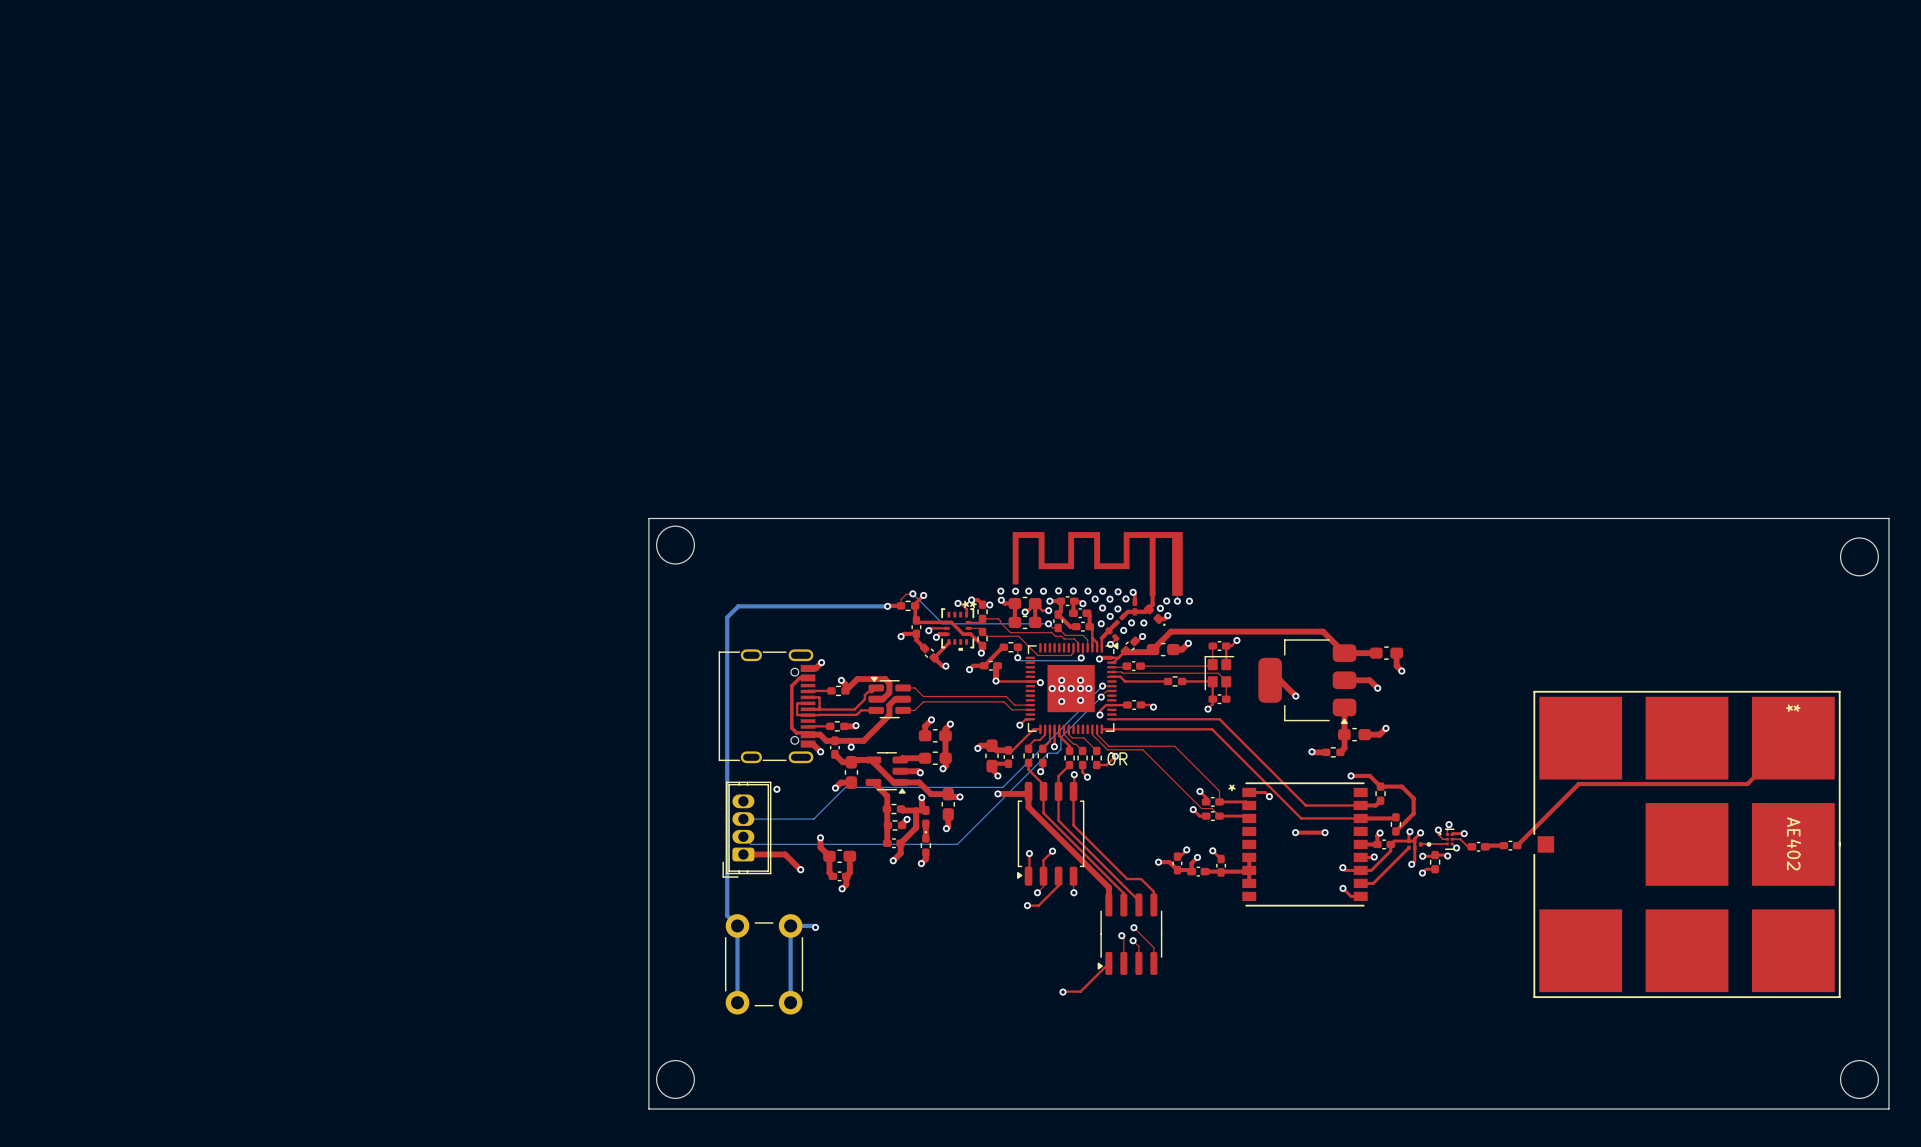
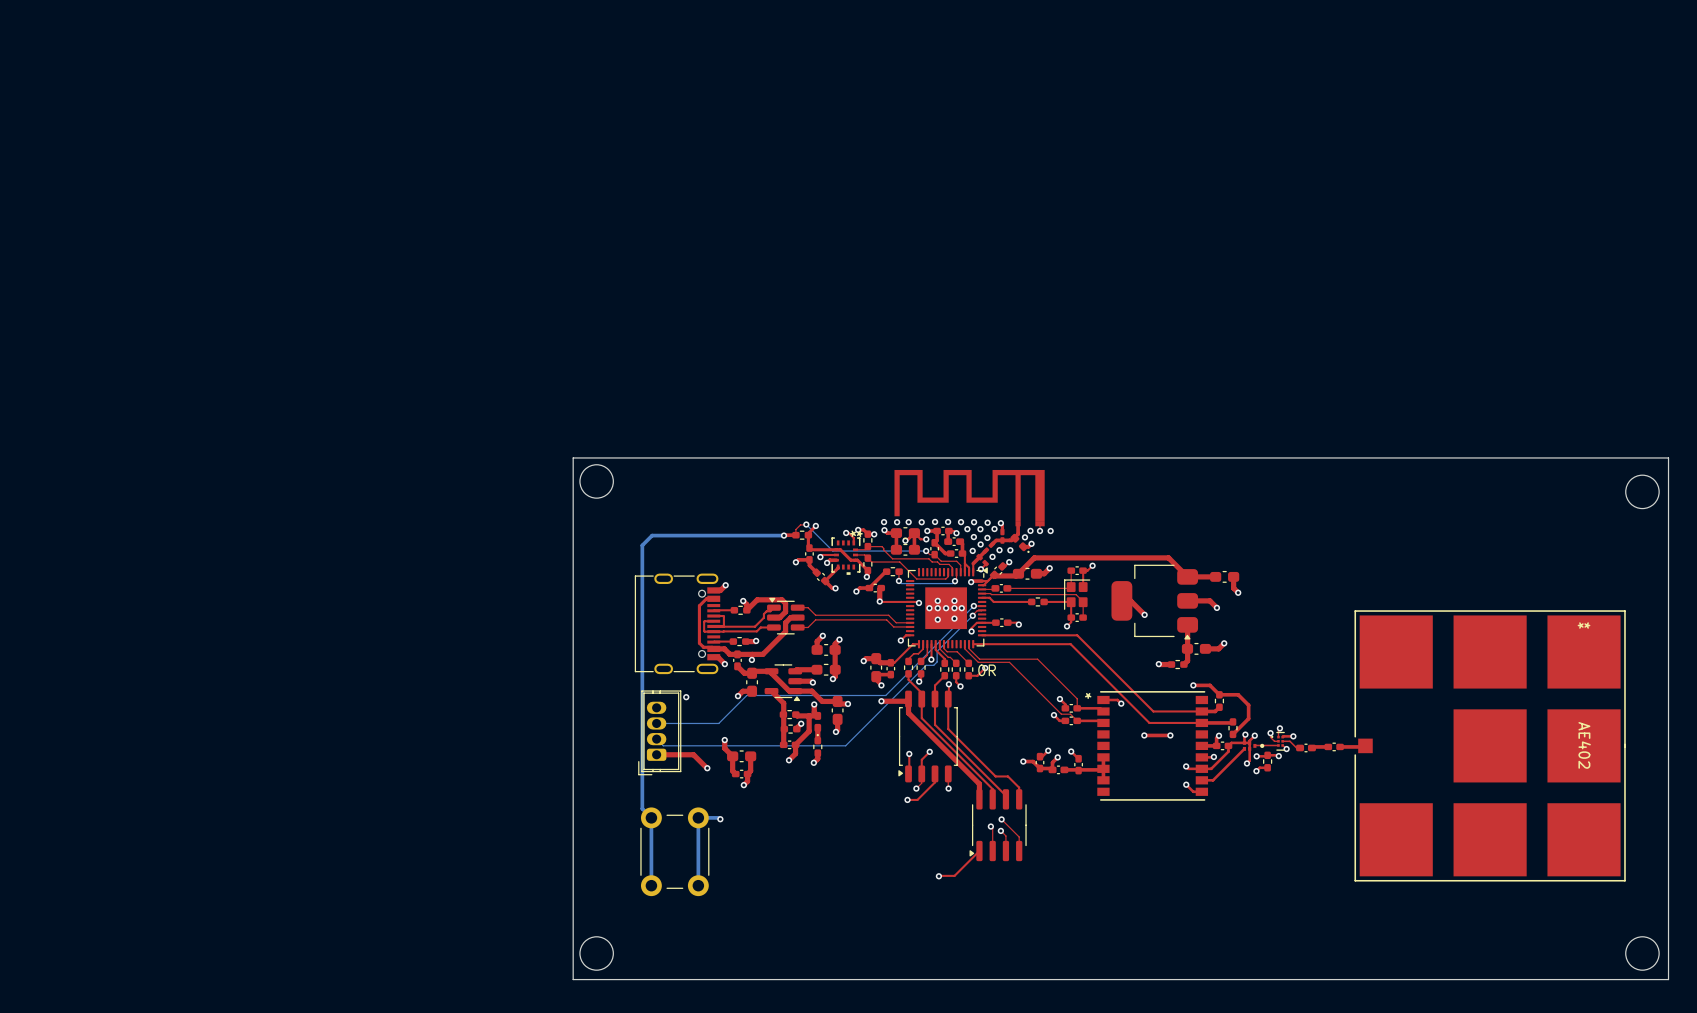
top track: (1793, 738) (1747, 784) (1578, 784) (1517, 845) -> (1365, 745) (1340, 746)

